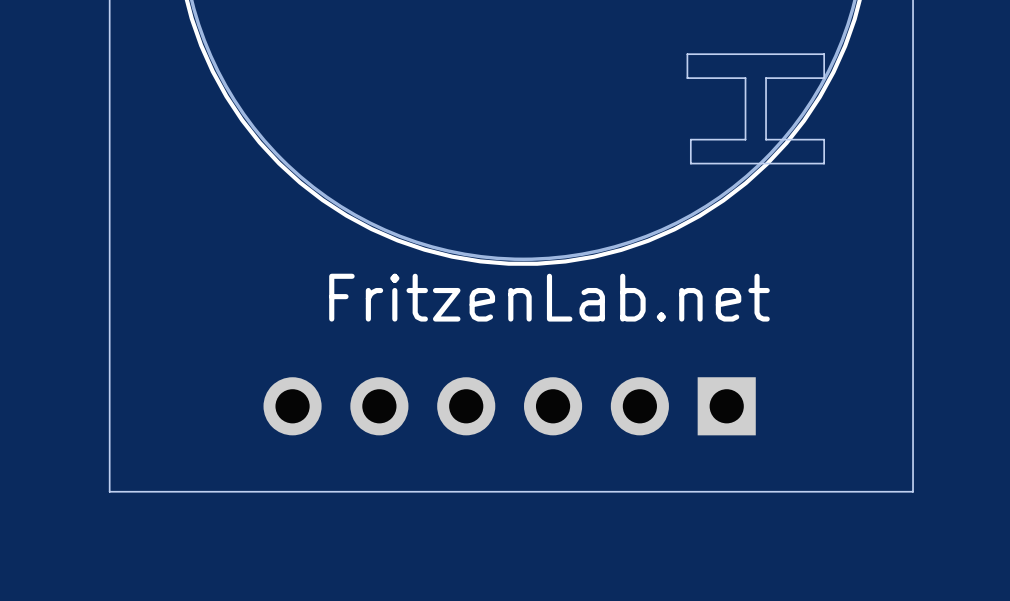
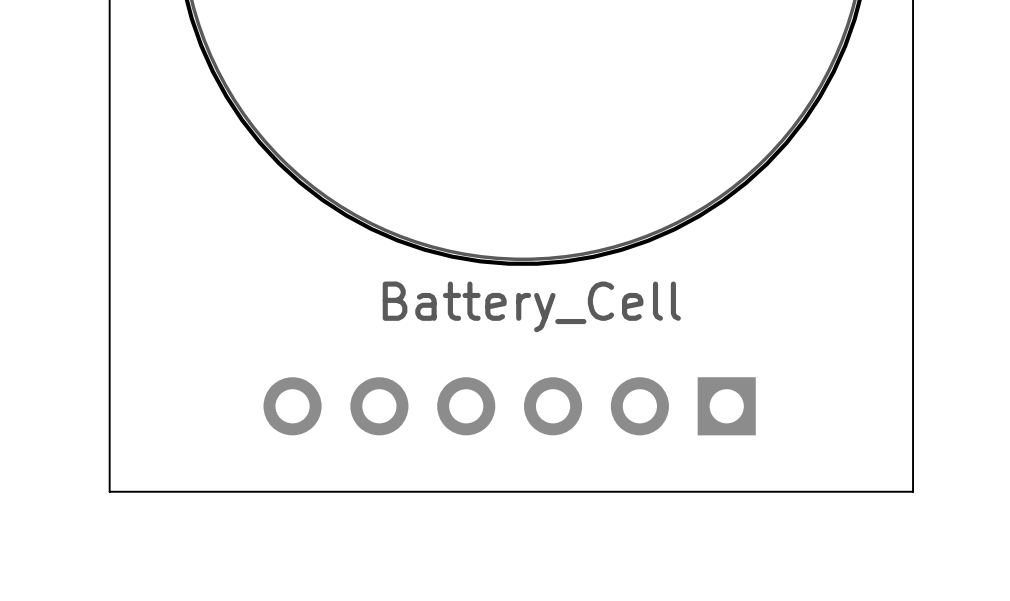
board edge: (824, 54) (824, 78) (766, 78) (766, 139) (824, 139) (824, 163) (690, 163) (690, 139) (745, 139) (745, 78) (687, 78) (687, 54) (824, 54) -> none
text: FritzenLab.net (549, 297) -> none
part value: none -> Battery_Cell (531, 306)

